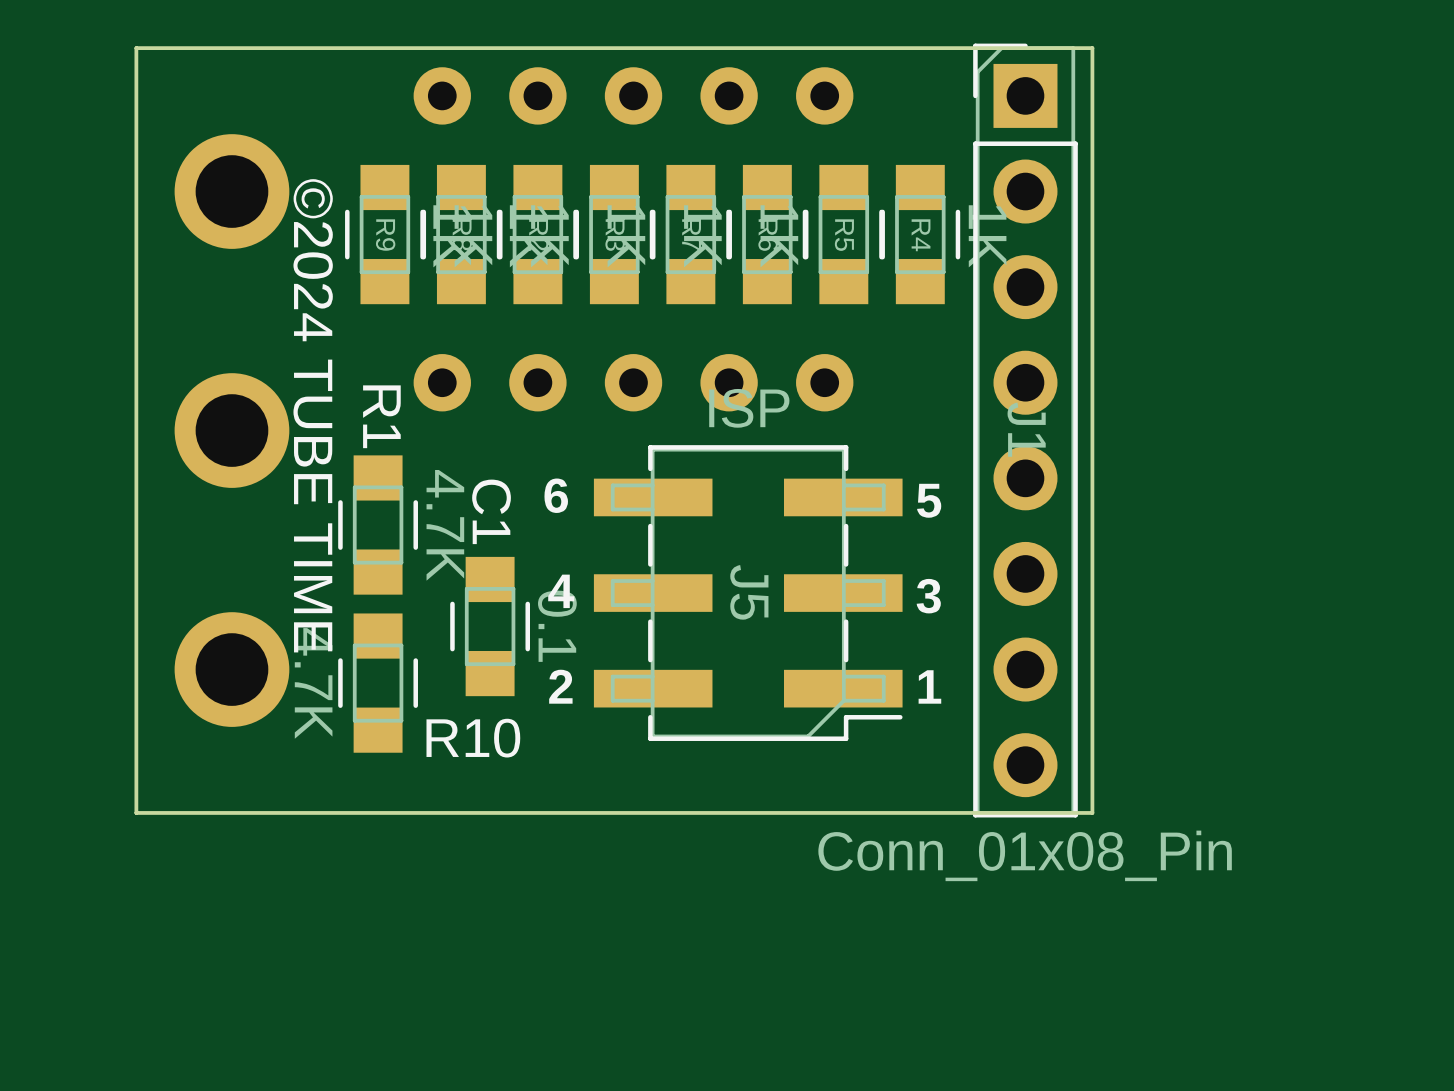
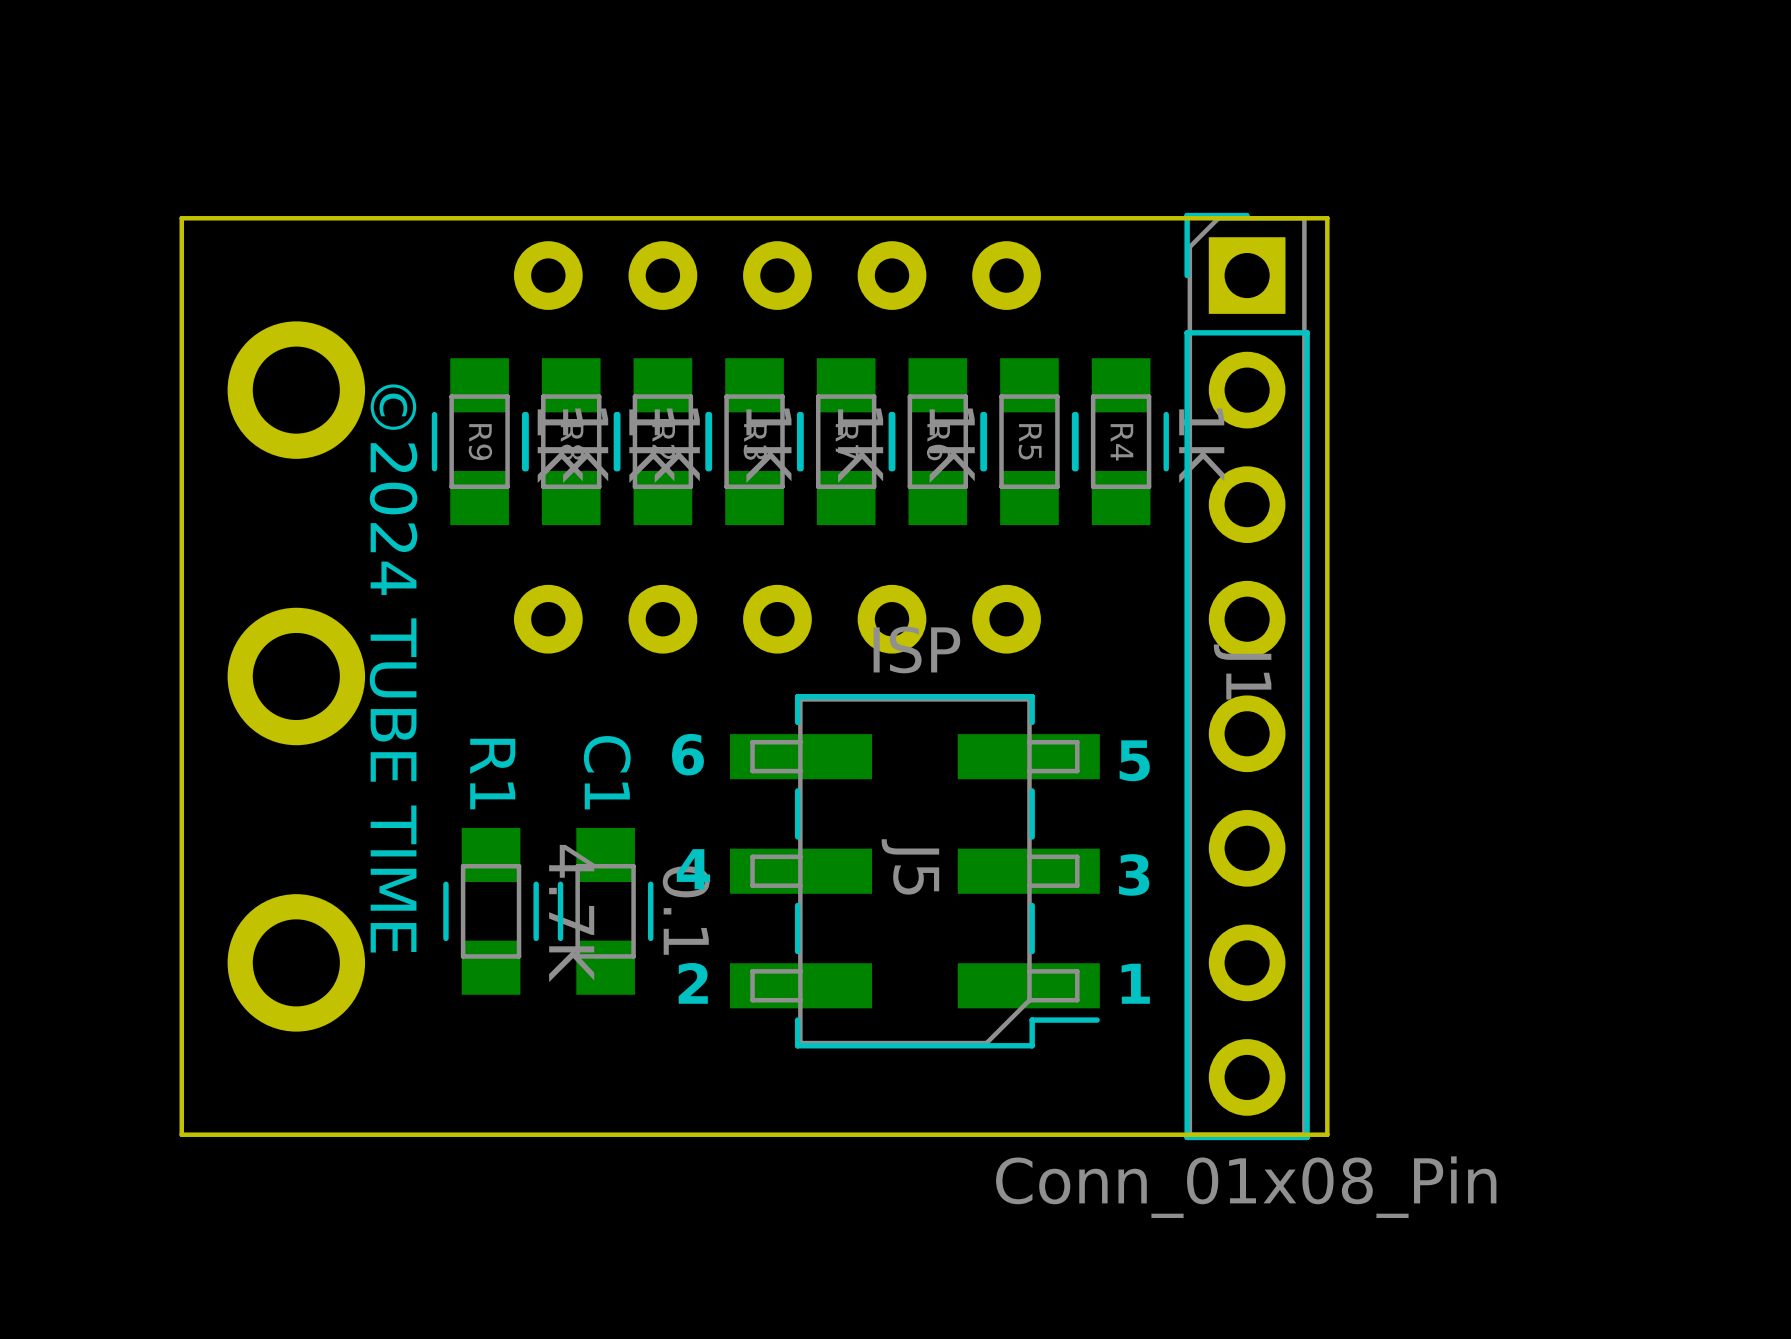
R1 name position: R1 (381, 416) -> R1 (492, 774)
R1 position: (378, 525) -> (491, 911)
R10: 4.7K (378, 683) -> none

